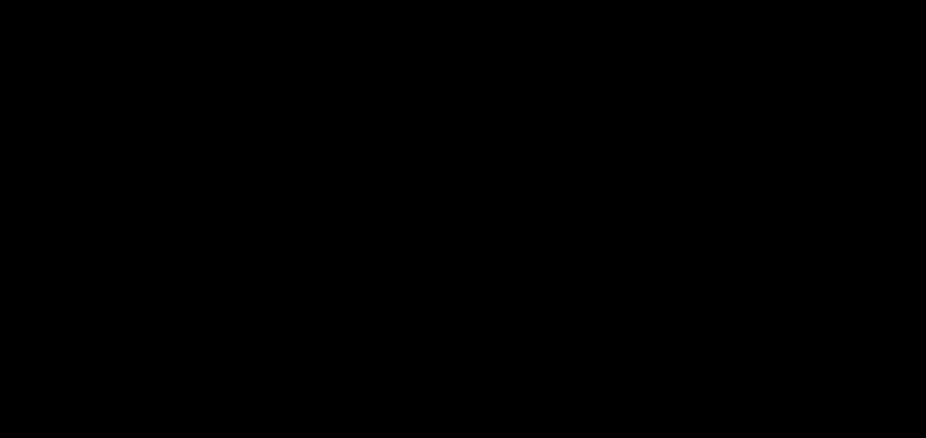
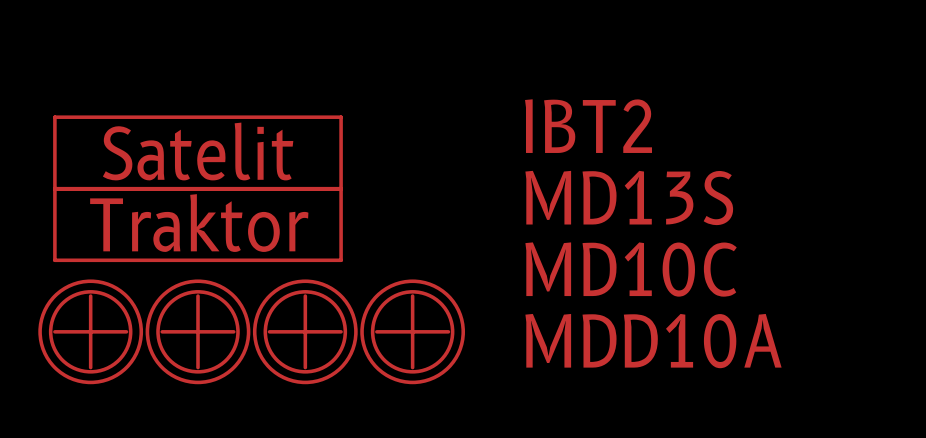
part: none -> (588, 126)
part: none -> (197, 152)
part: none -> (629, 197)
part: none -> (197, 224)
part: none -> (631, 269)
part: none -> (90, 331)
part: none -> (197, 331)
part: none -> (305, 331)
part: none -> (412, 331)
part: none -> (653, 341)

